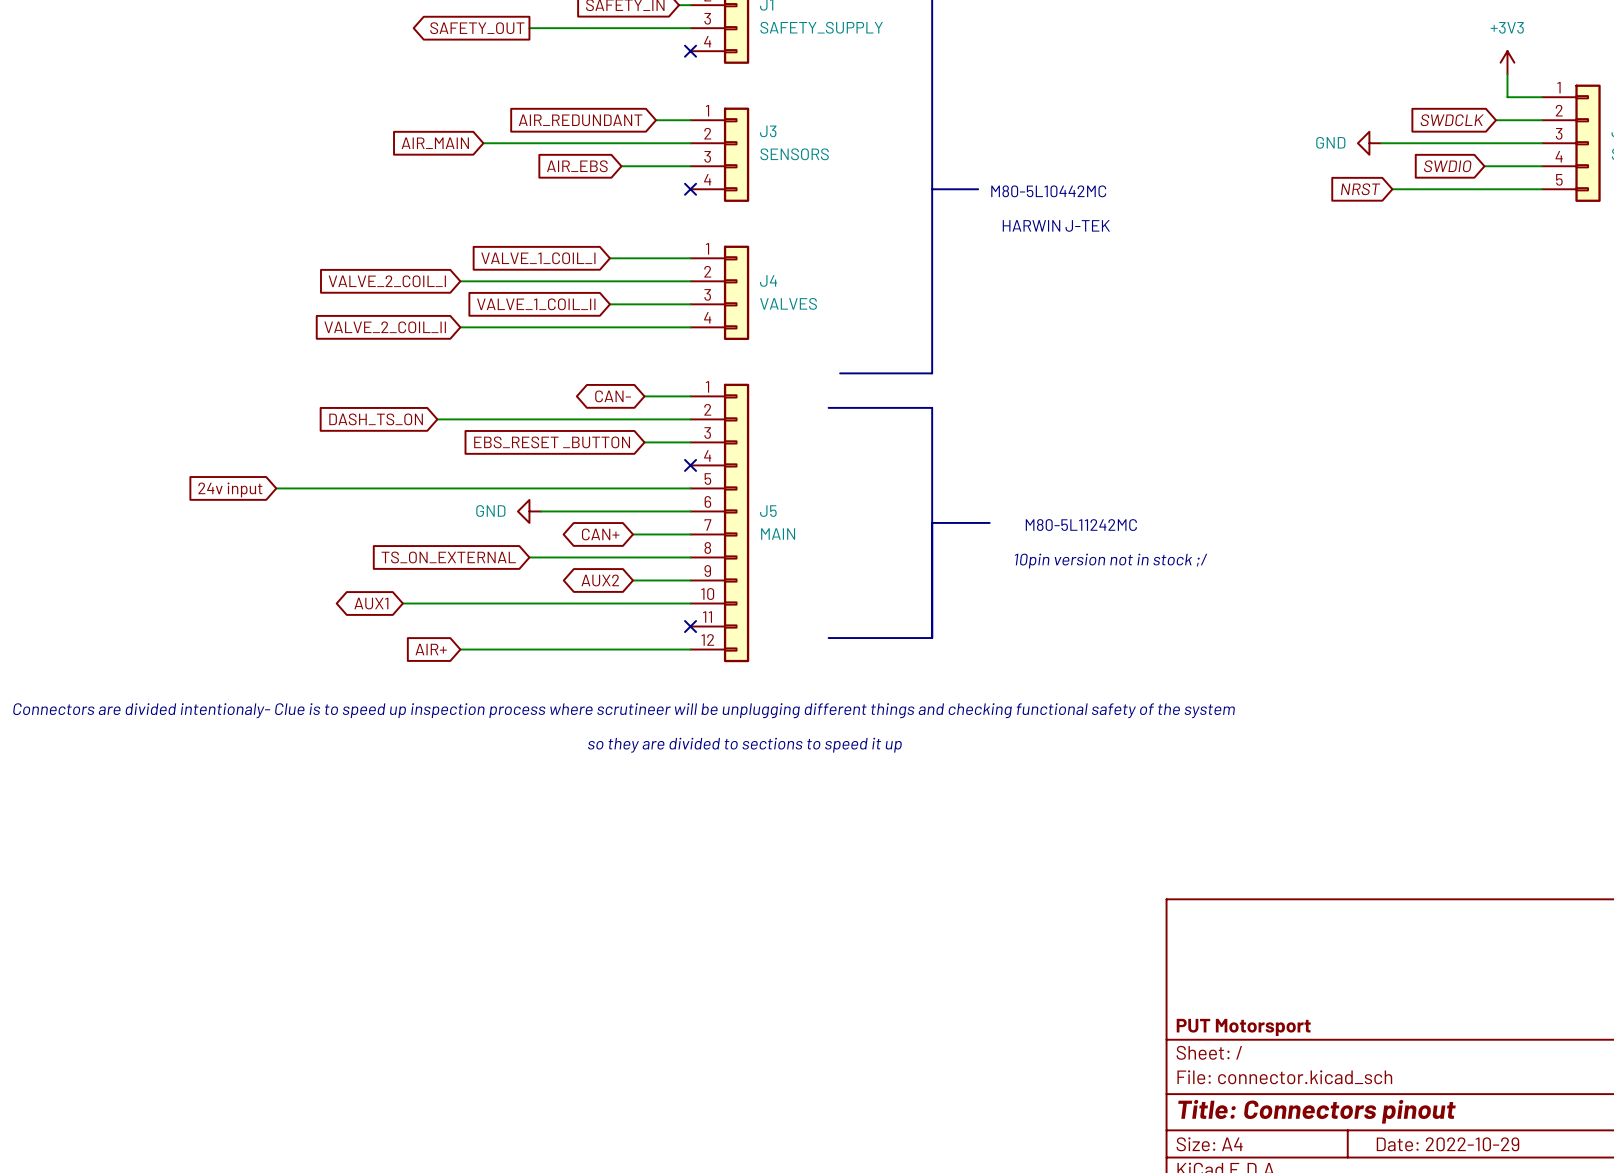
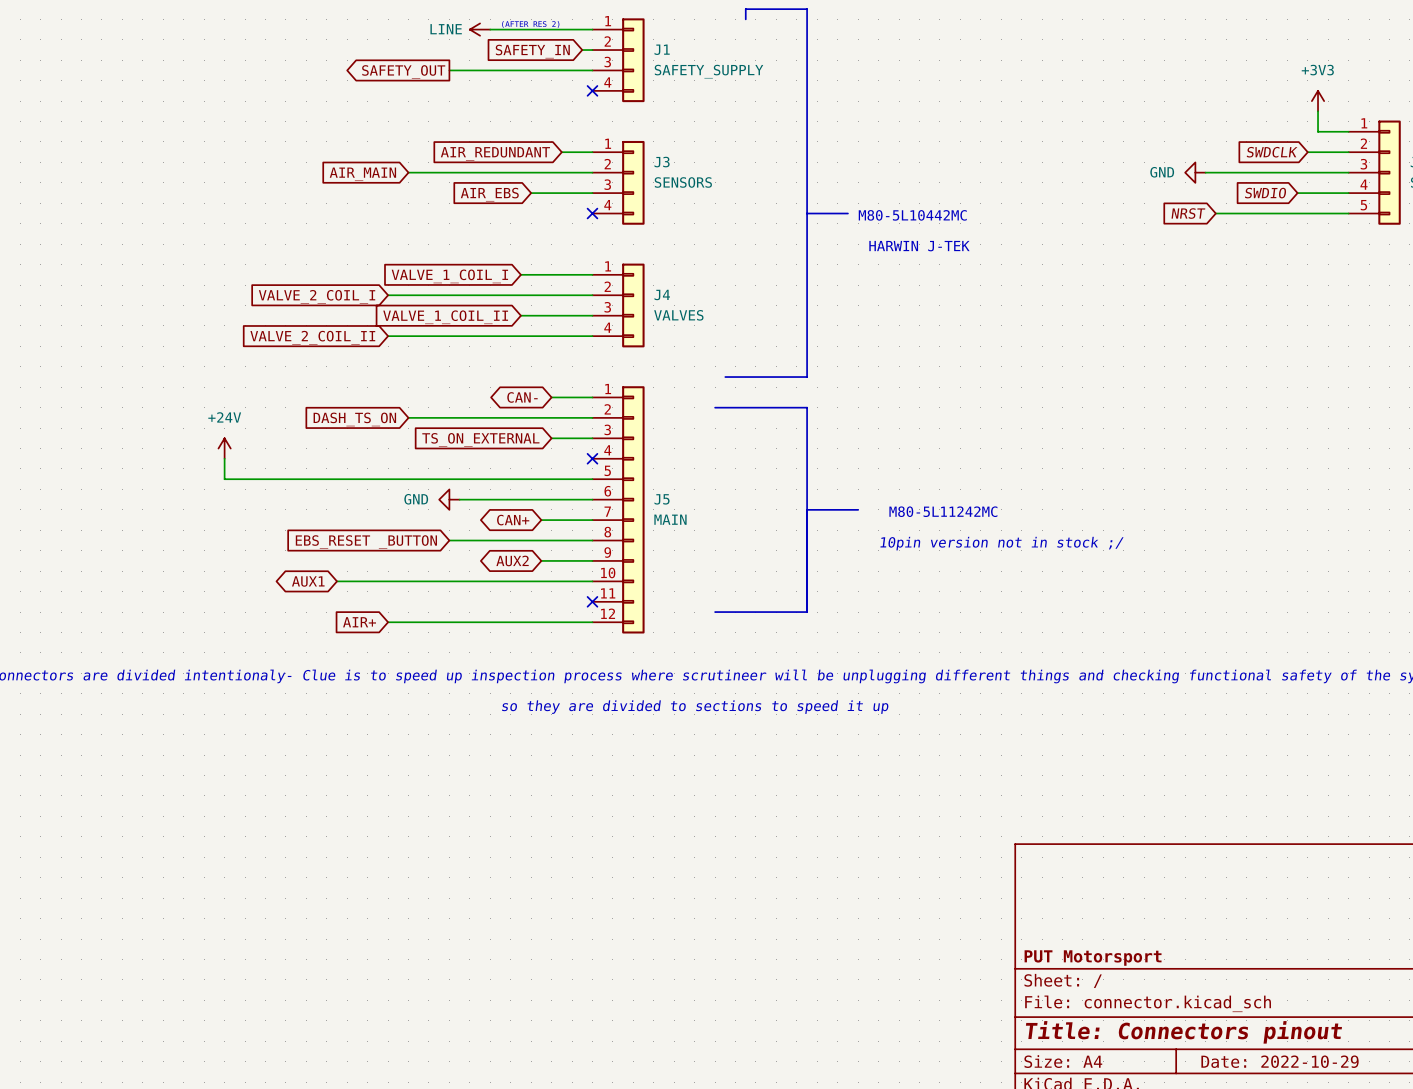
global label position: DASH_TS_ON (376, 419) -> DASH_TS_ON (354, 419)
wire: (437, 419) (483, 419) -> none
global label: EBS_RESET _BUTTON (552, 442) -> TS_ON_EXTERNAL (480, 439)
power symbol: none -> +24V (224, 448)
wire: none -> (224, 458) (224, 479)
global label: 24v input (230, 489) -> none
global label: TS_ON_EXTERNAL (448, 557) -> EBS_RESET _BUTTON (366, 542)

